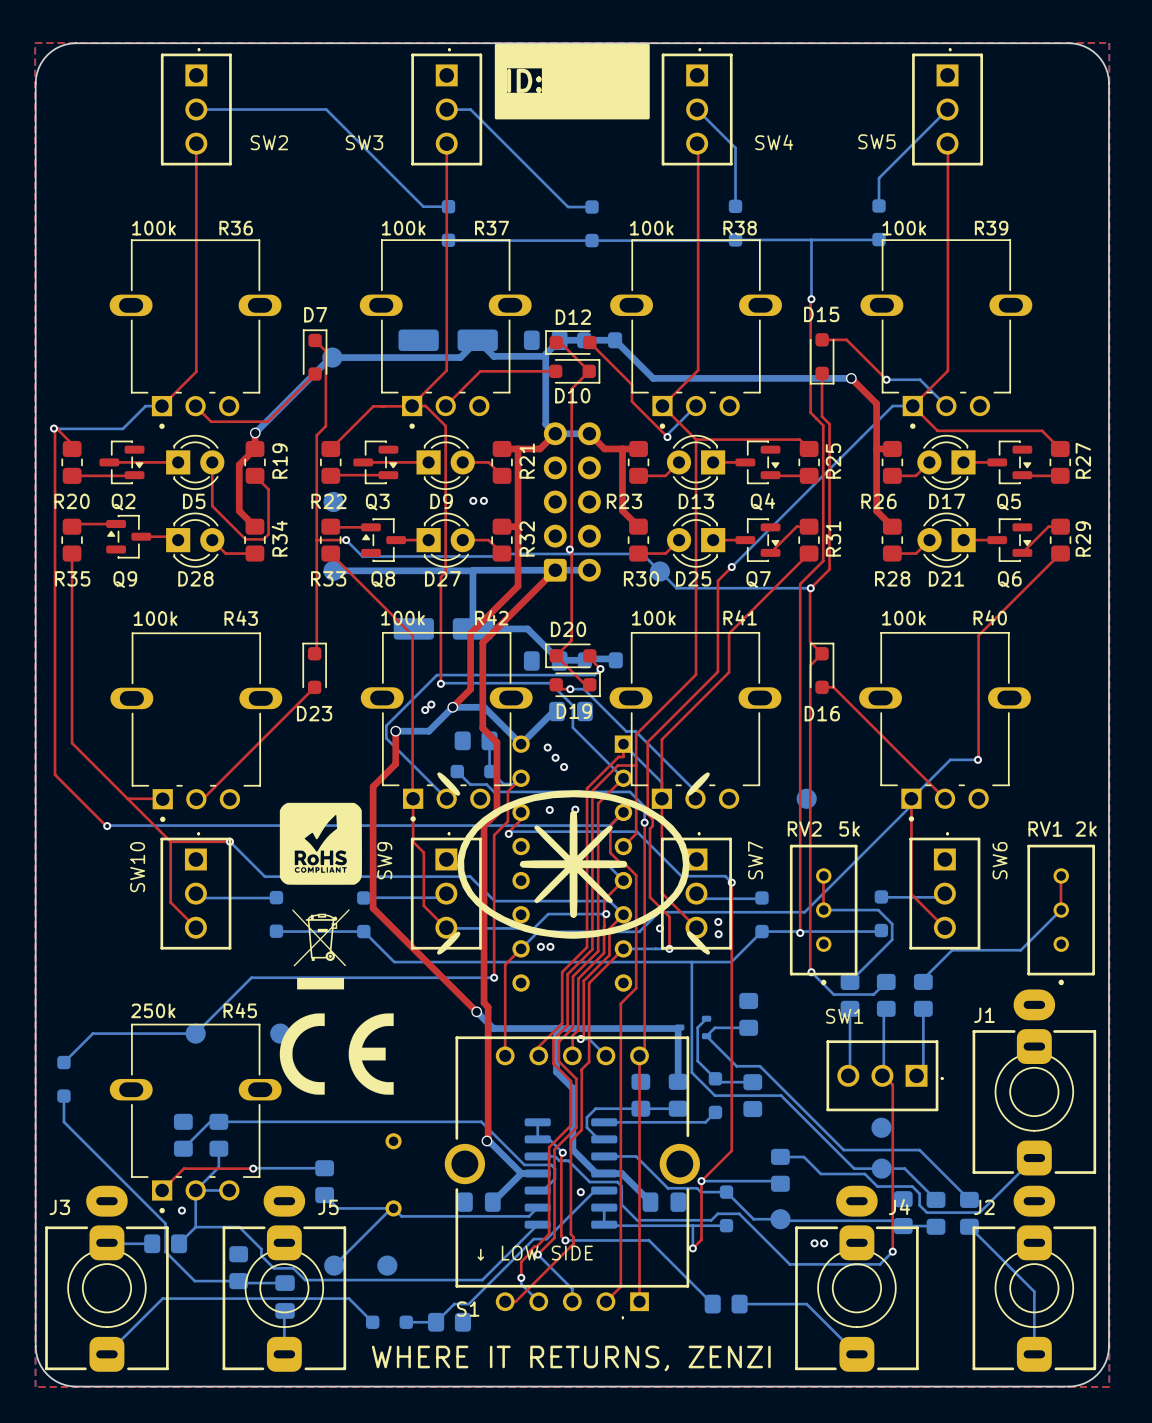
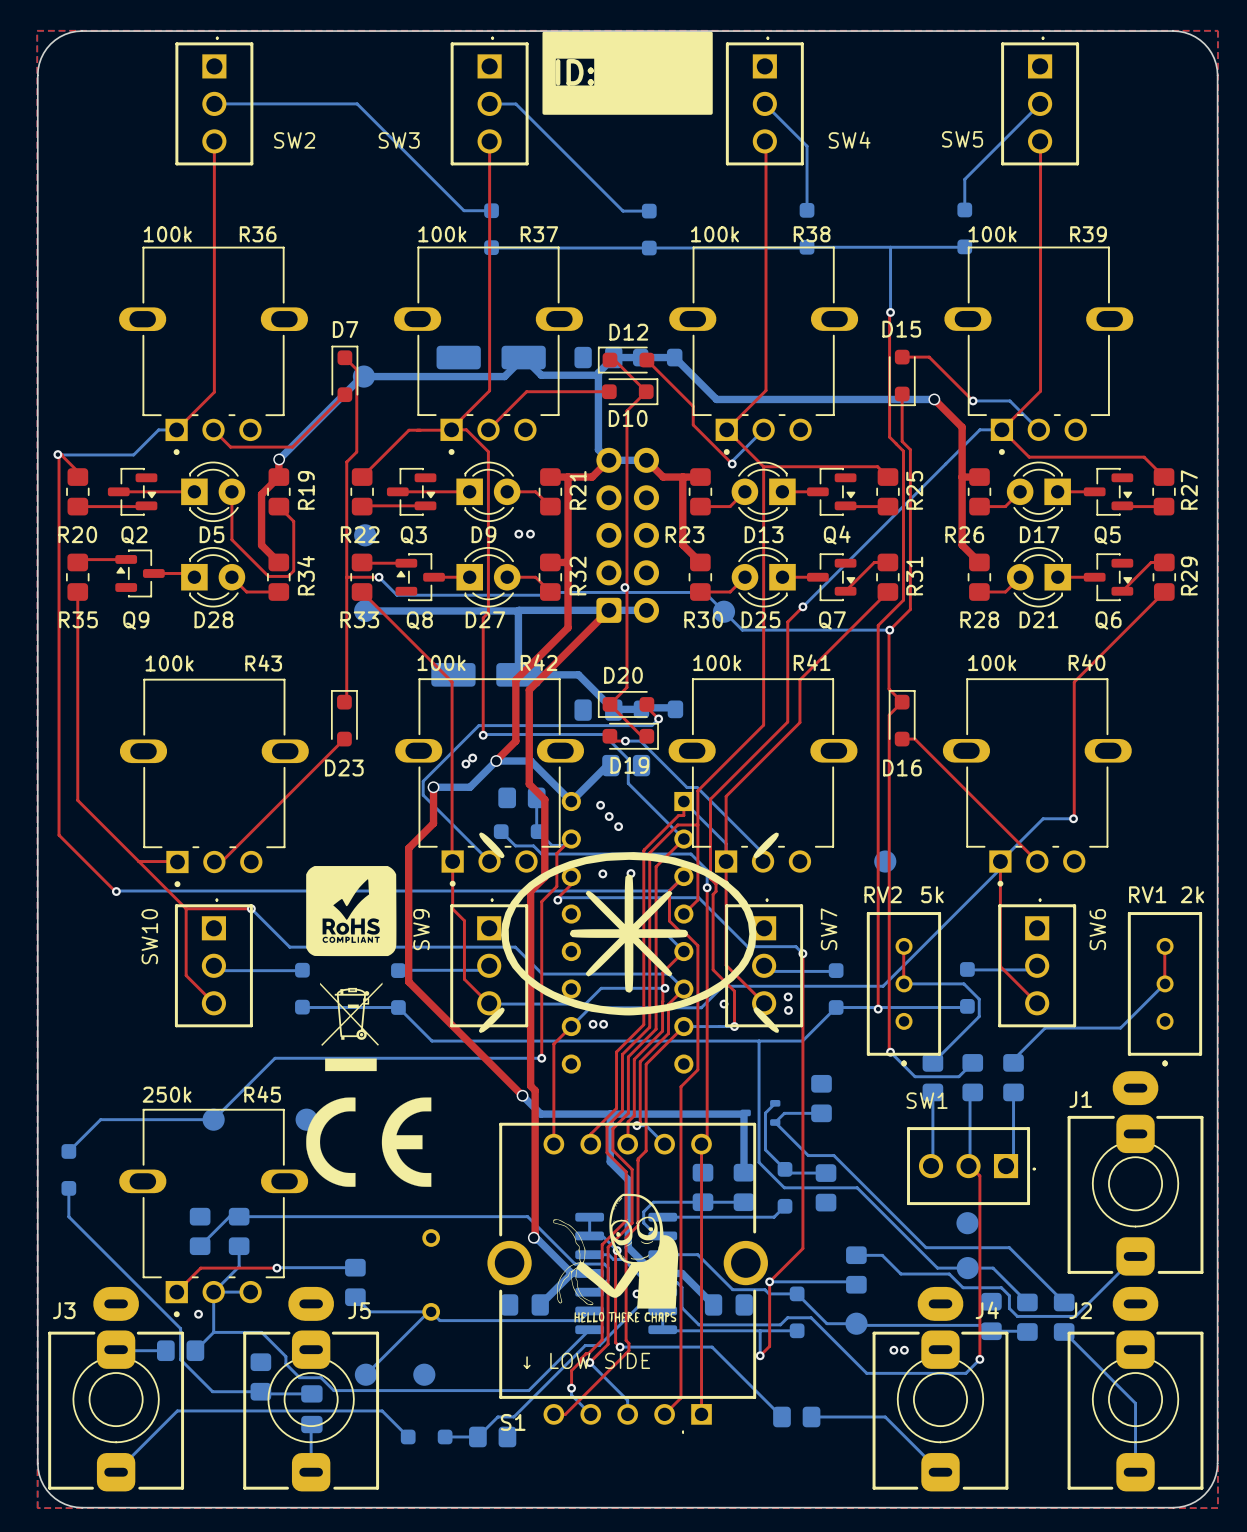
drawing: none -> [553, 1193, 679, 1323]
text: WHERE IT RETURNS, ZENZI (571, 1358) -> none

